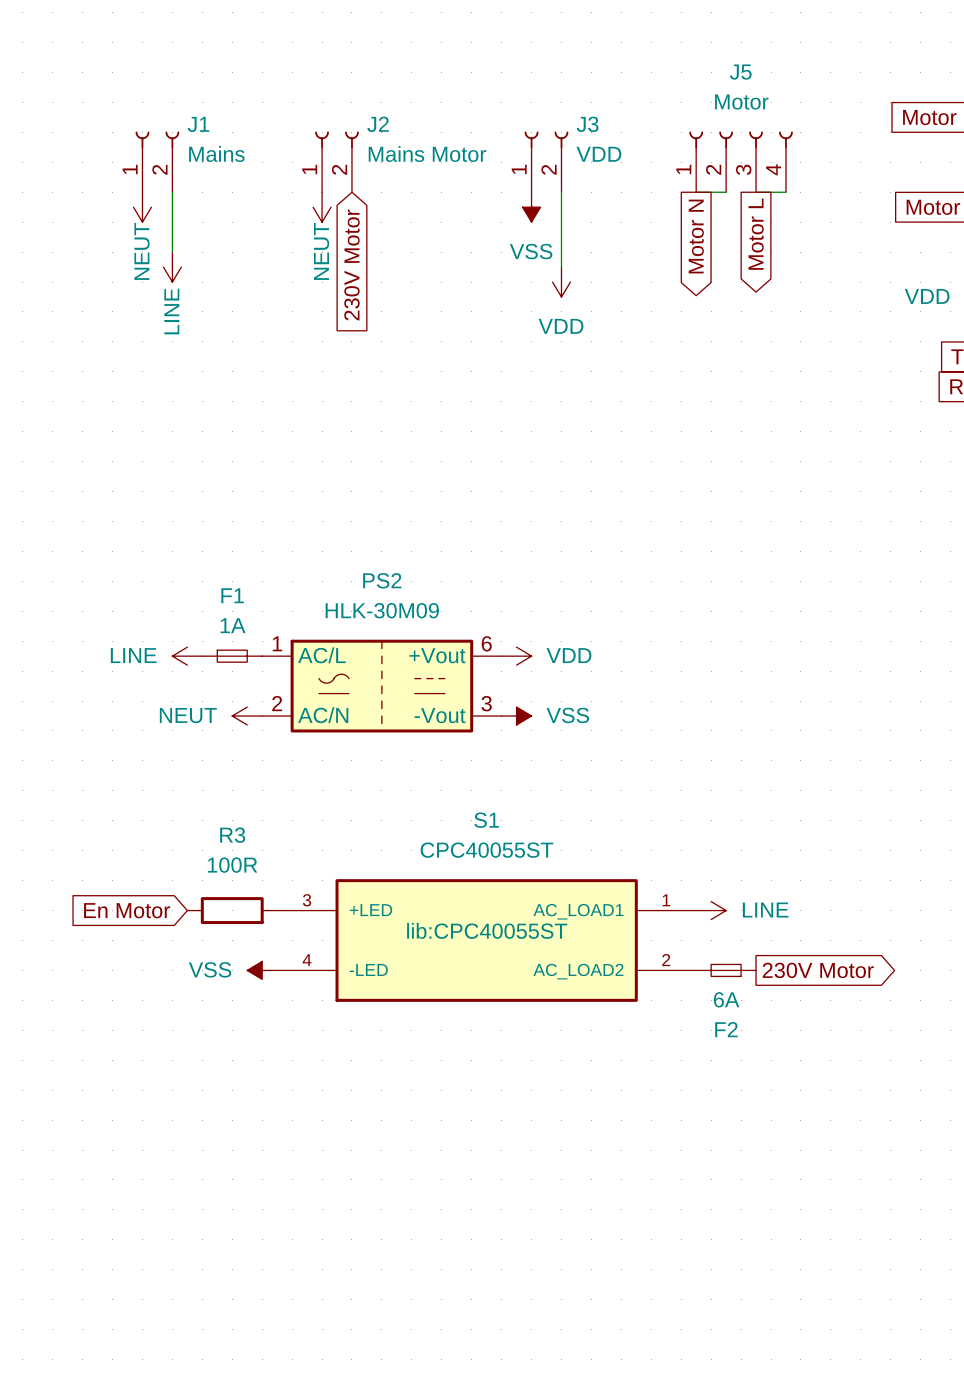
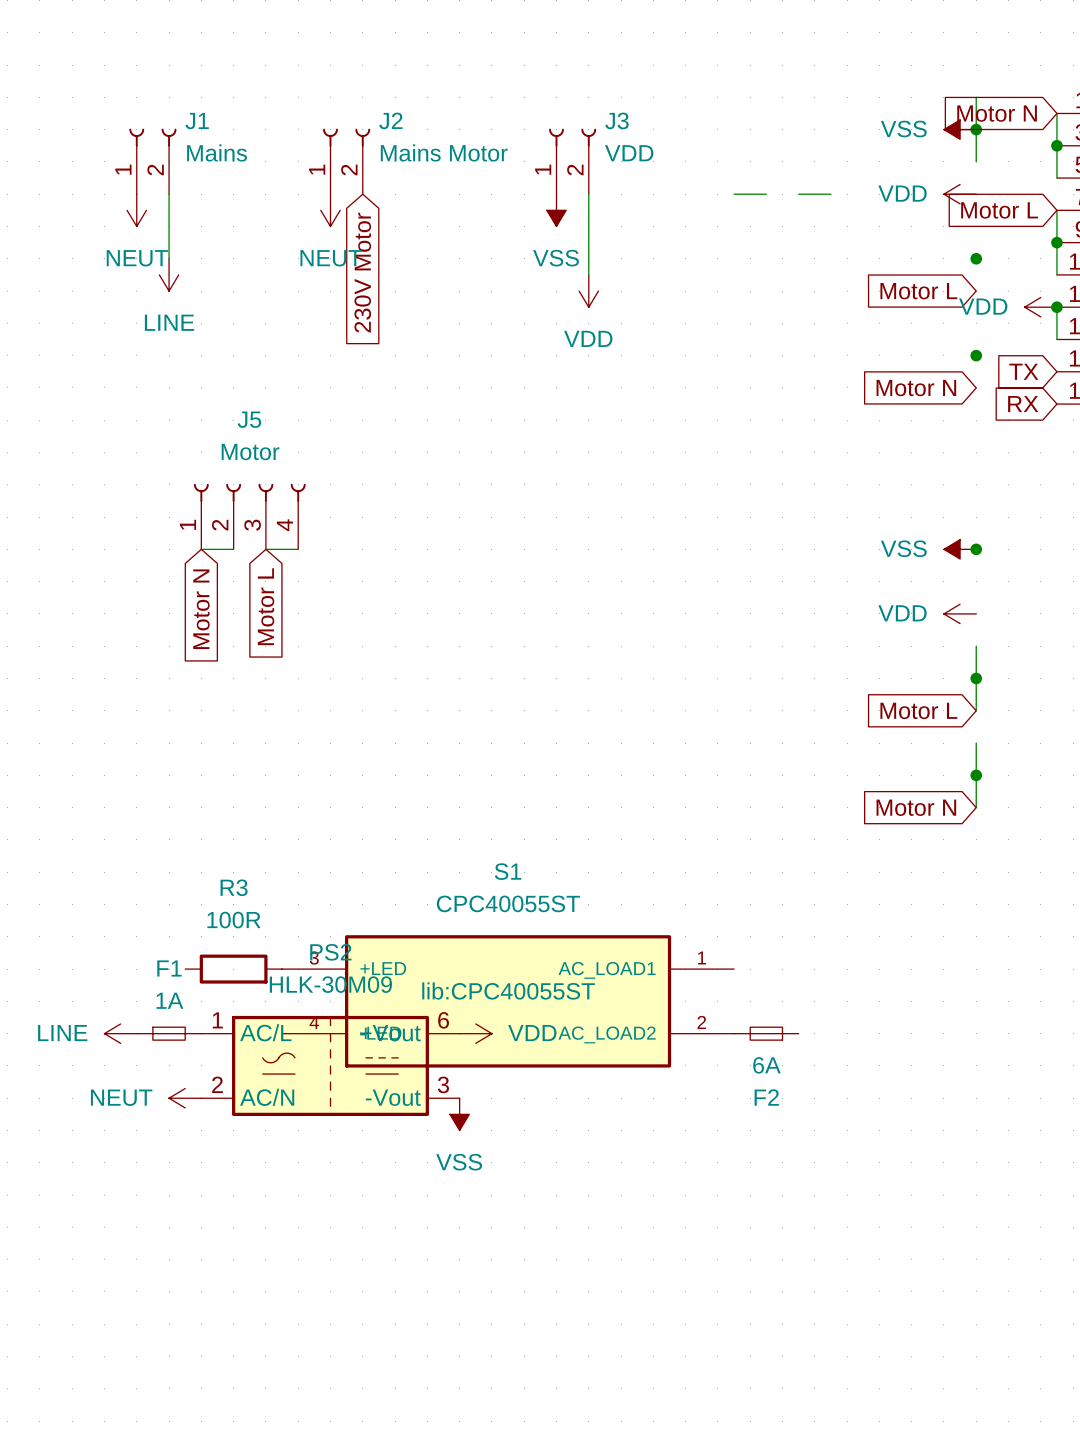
wire: none -> (976, 97) (976, 161)
power symbol: none -> VSS (960, 129)
junction: none -> (976, 129)
J5 position: (741, 161) -> (249, 516)
power symbol: none -> VDD (960, 194)
global label: Motor L (756, 234) -> none
global label: Motor N (696, 236) -> none
power symbol text rotation: 0° (142, 251) -> 90° clockwise (137, 258)
power symbol text rotation: 0° (321, 251) -> 90° clockwise (331, 258)
junction: none -> (976, 258)
global label: none -> Motor L (918, 291)
power symbol text rotation: 0° (171, 311) -> 90° clockwise (169, 322)
junction: none -> (976, 355)
global label: none -> Motor N (916, 388)
wire: none -> (201, 549) (233, 549)
wire: none -> (265, 549) (298, 549)
power symbol: none -> VSS (960, 549)
junction: none -> (976, 549)
global label: none -> Motor L (266, 606)
global label: none -> Motor N (201, 609)
power symbol: none -> VDD (960, 613)
wire: none -> (976, 646) (976, 710)
junction: none -> (976, 678)
power symbol: LINE (187, 656) -> none
F1 position: (232, 656) -> (169, 1033)
power symbol: VDD (516, 656) -> none
global label: none -> Motor L (918, 710)
PS2 position: (381, 686) -> (330, 1065)
wire: none -> (976, 743) (976, 807)
power symbol: NEUT (247, 716) -> none
power symbol: VSS (516, 716) -> none
junction: none -> (976, 775)
global label: none -> Motor N (916, 807)
global label: En Motor (127, 910) -> none
power symbol: LINE (711, 910) -> none
power symbol: none -> LINE (120, 1033)
power symbol: VSS (262, 970) -> none
power symbol: none -> VDD (475, 1033)
global label: 230V Motor (818, 970) -> none
power symbol: none -> NEUT (185, 1098)
power symbol: none -> VSS (459, 1114)

